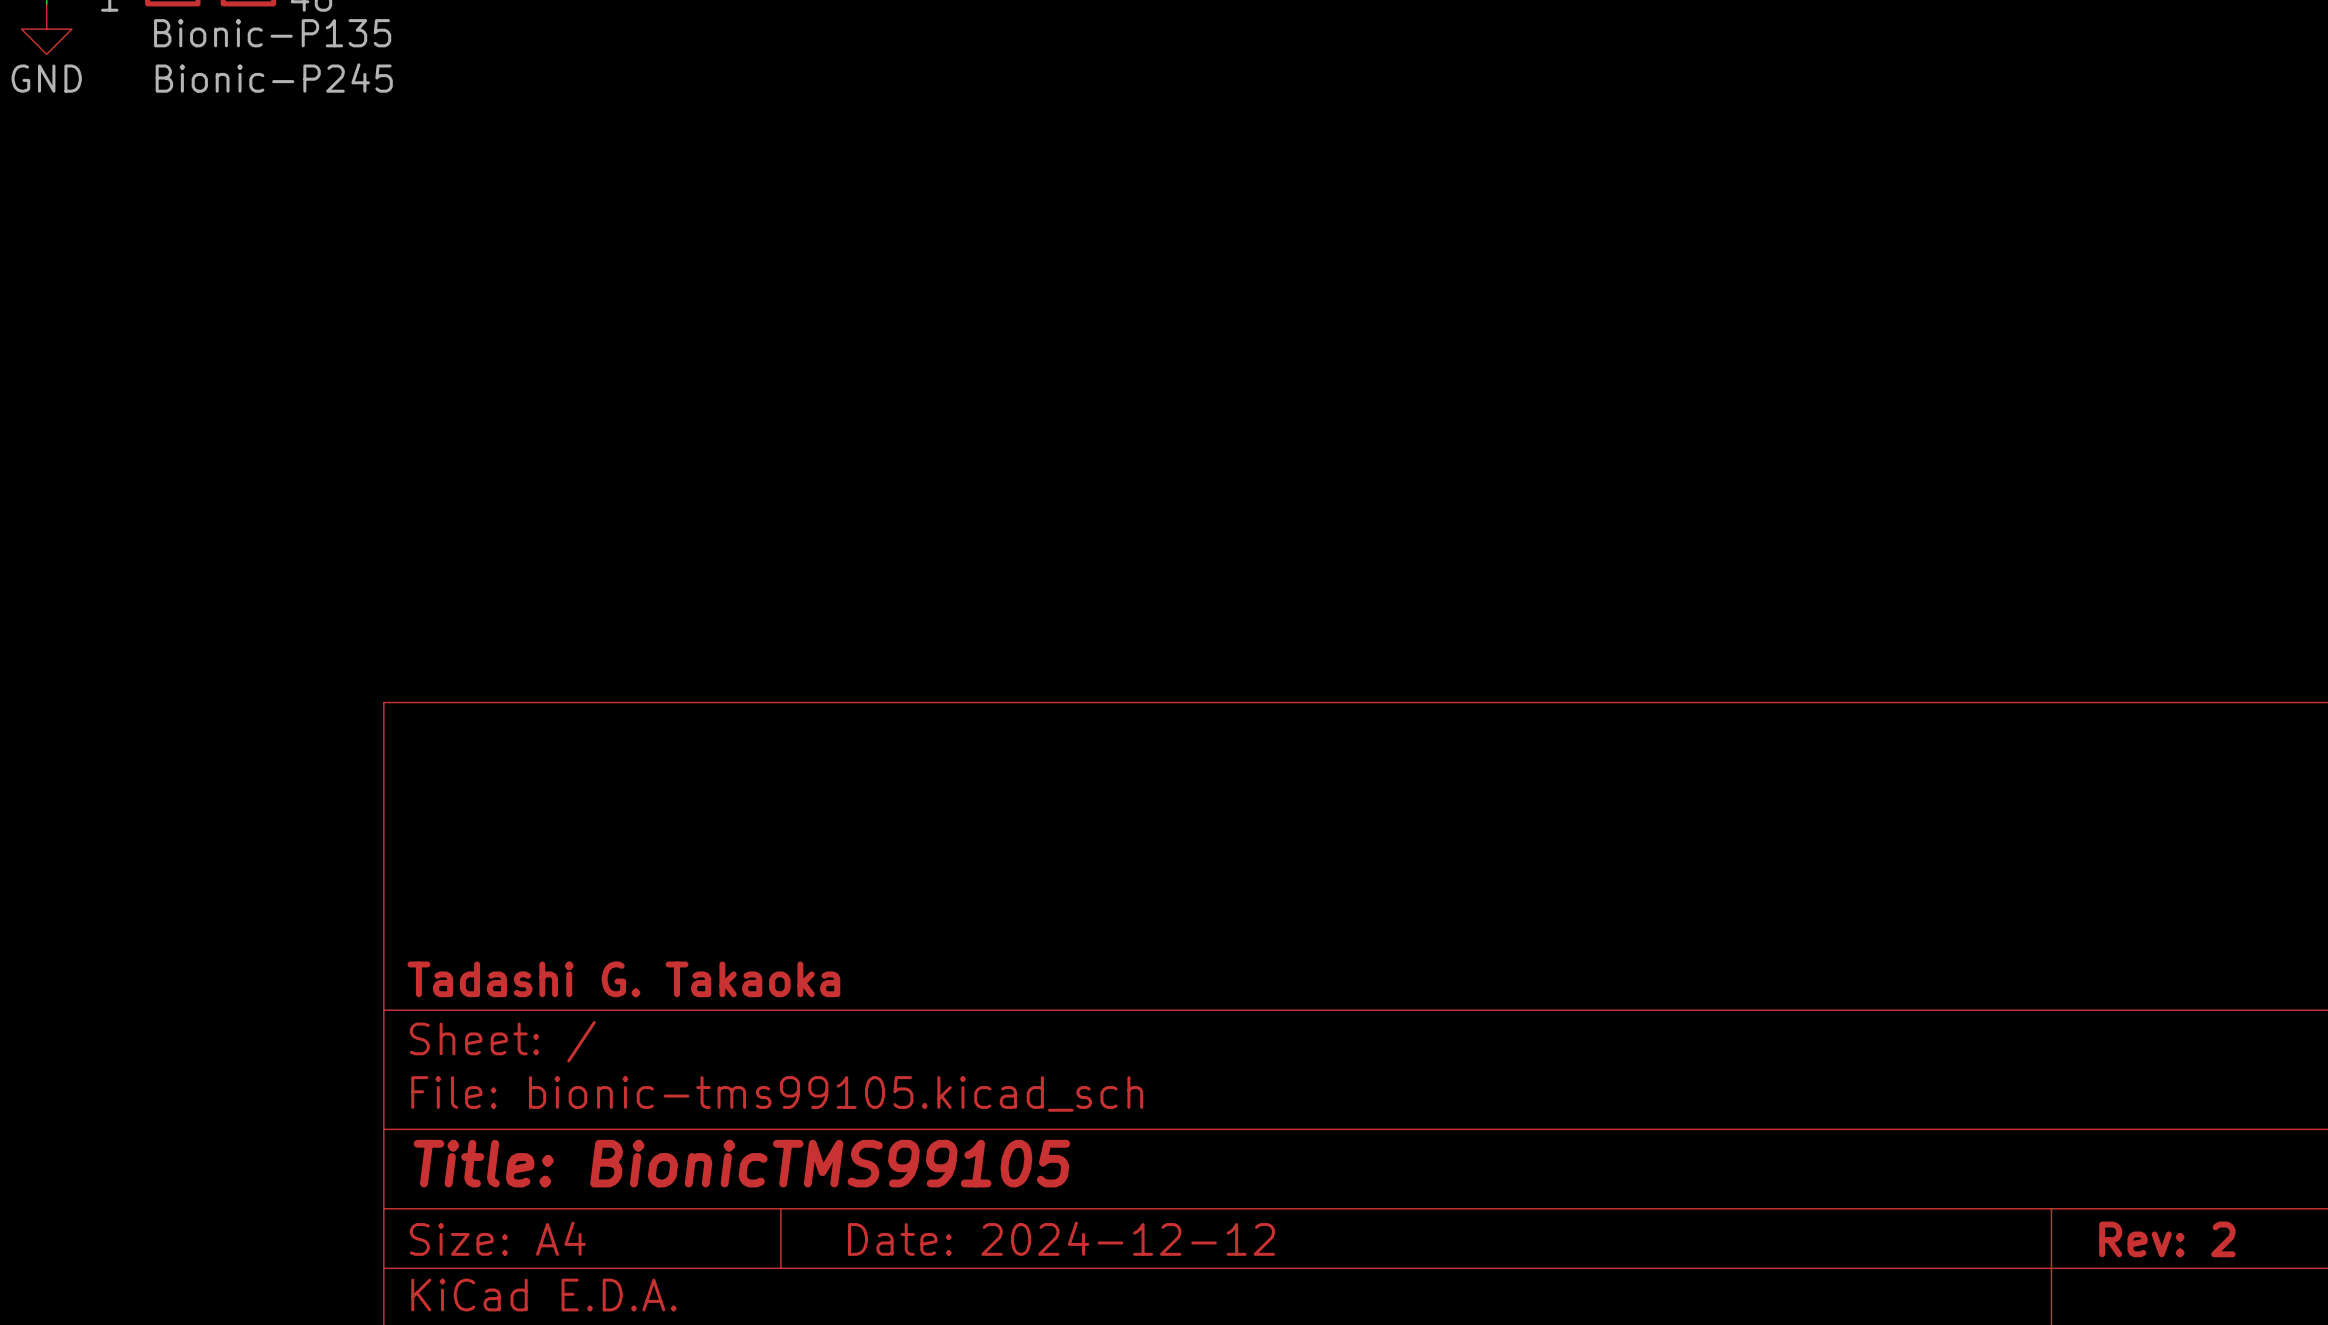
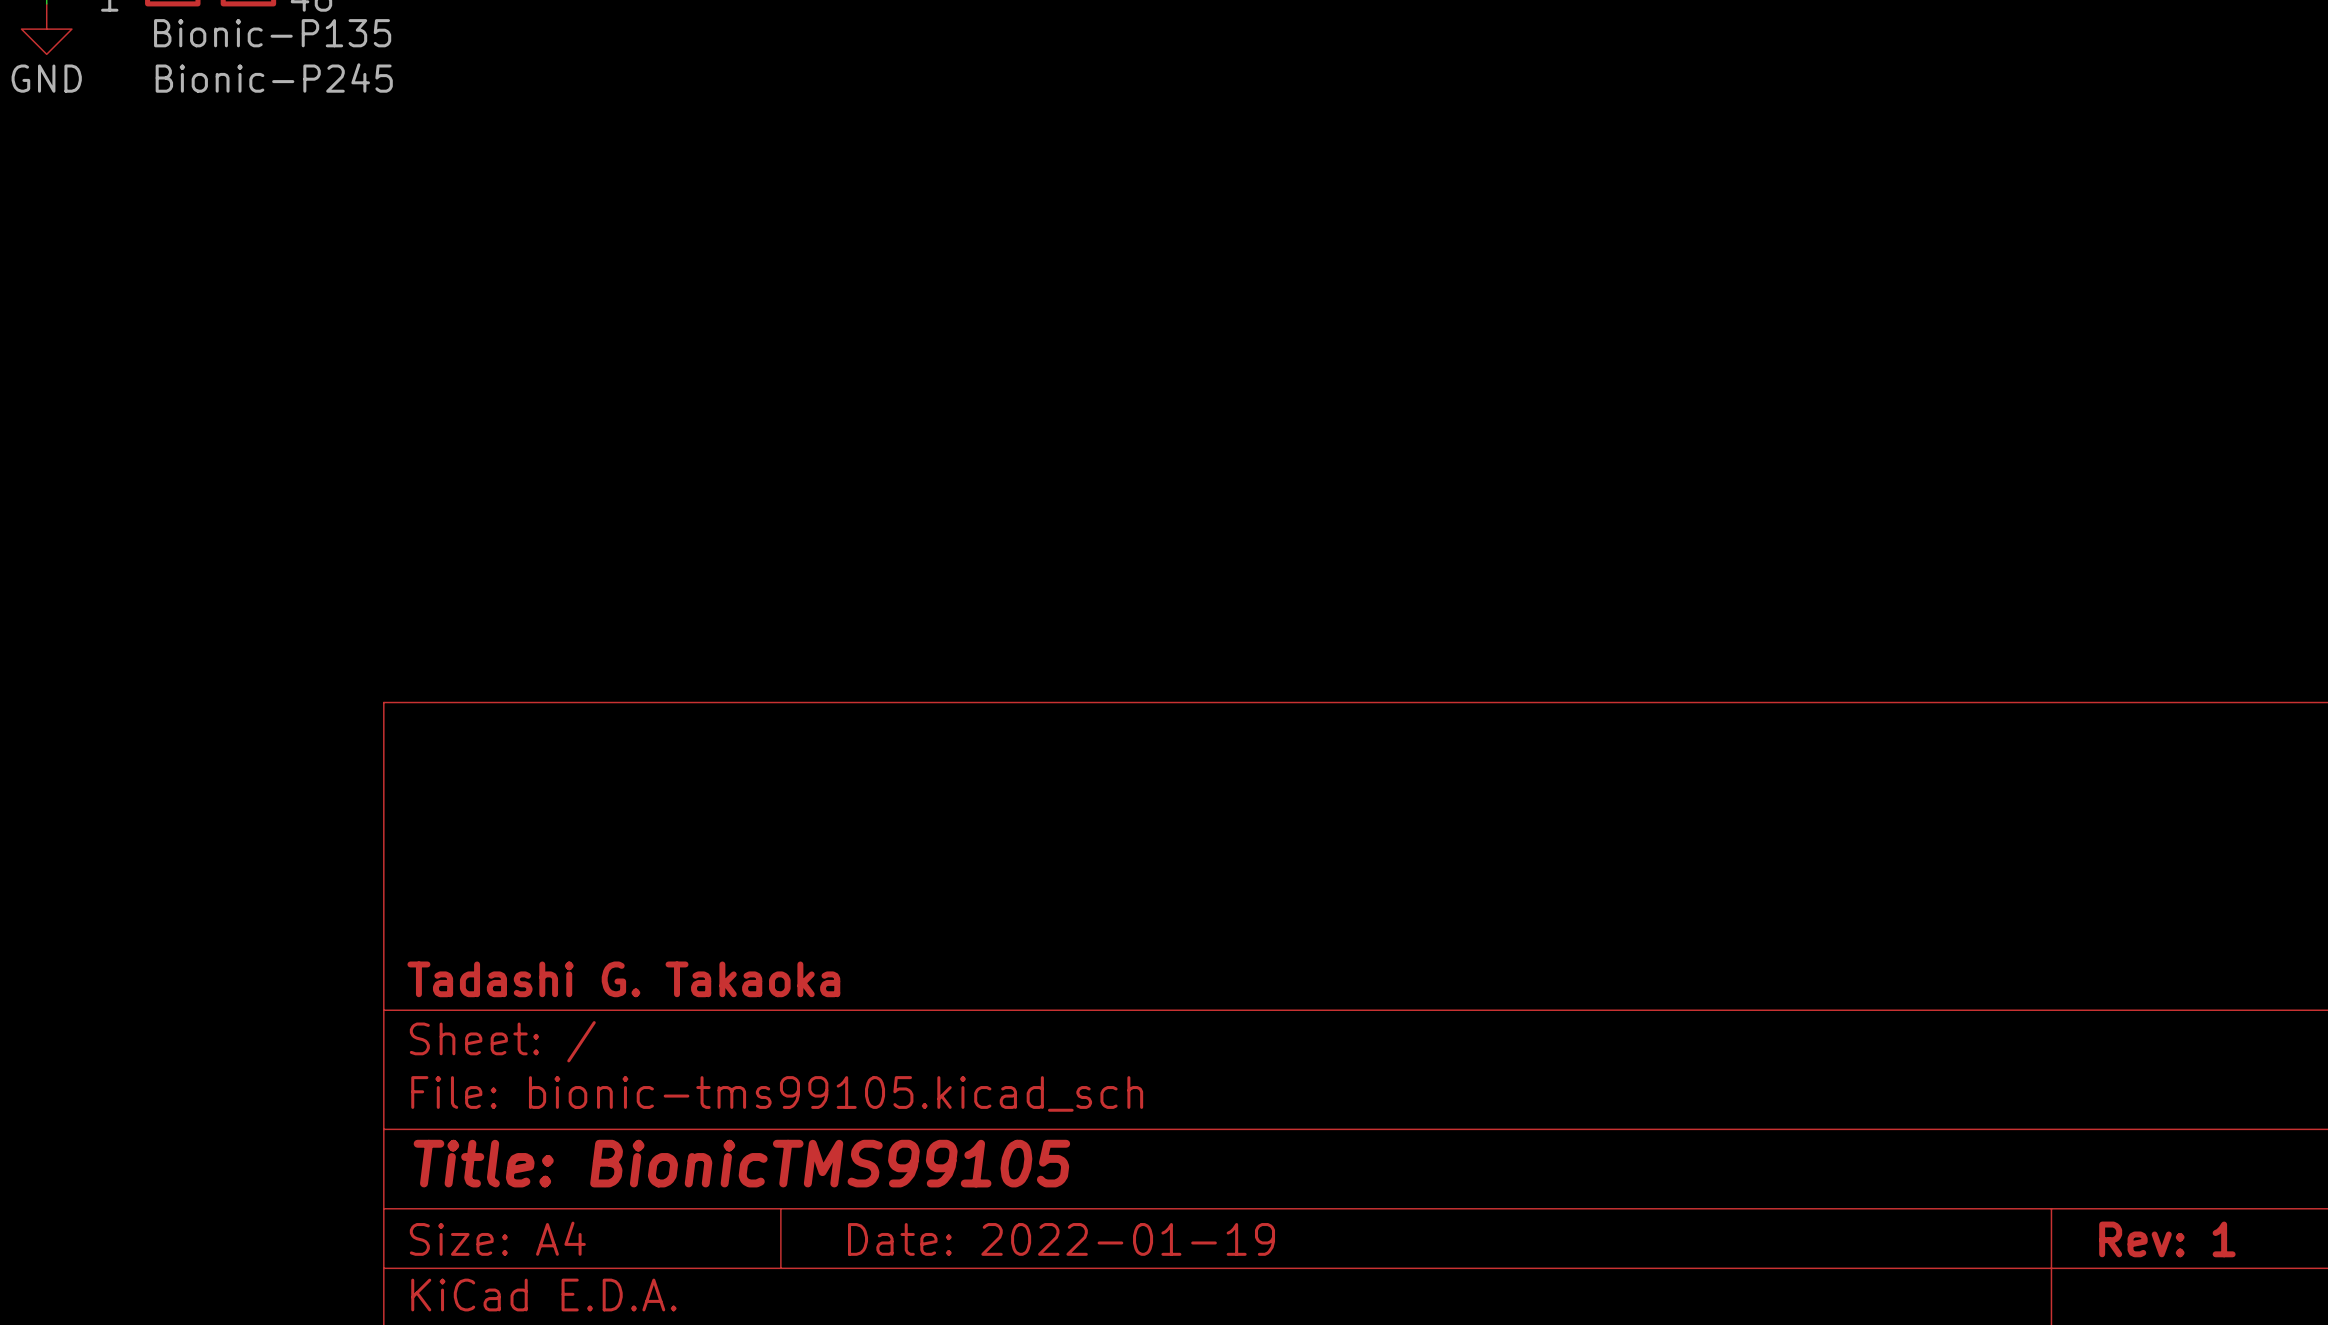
title block: Date: 2024-12-12 (1061, 1238) -> Date: 2022-01-19 (1061, 1239)
title block: Rev: 2 (2167, 1239) -> Rev: 1 (2167, 1239)

